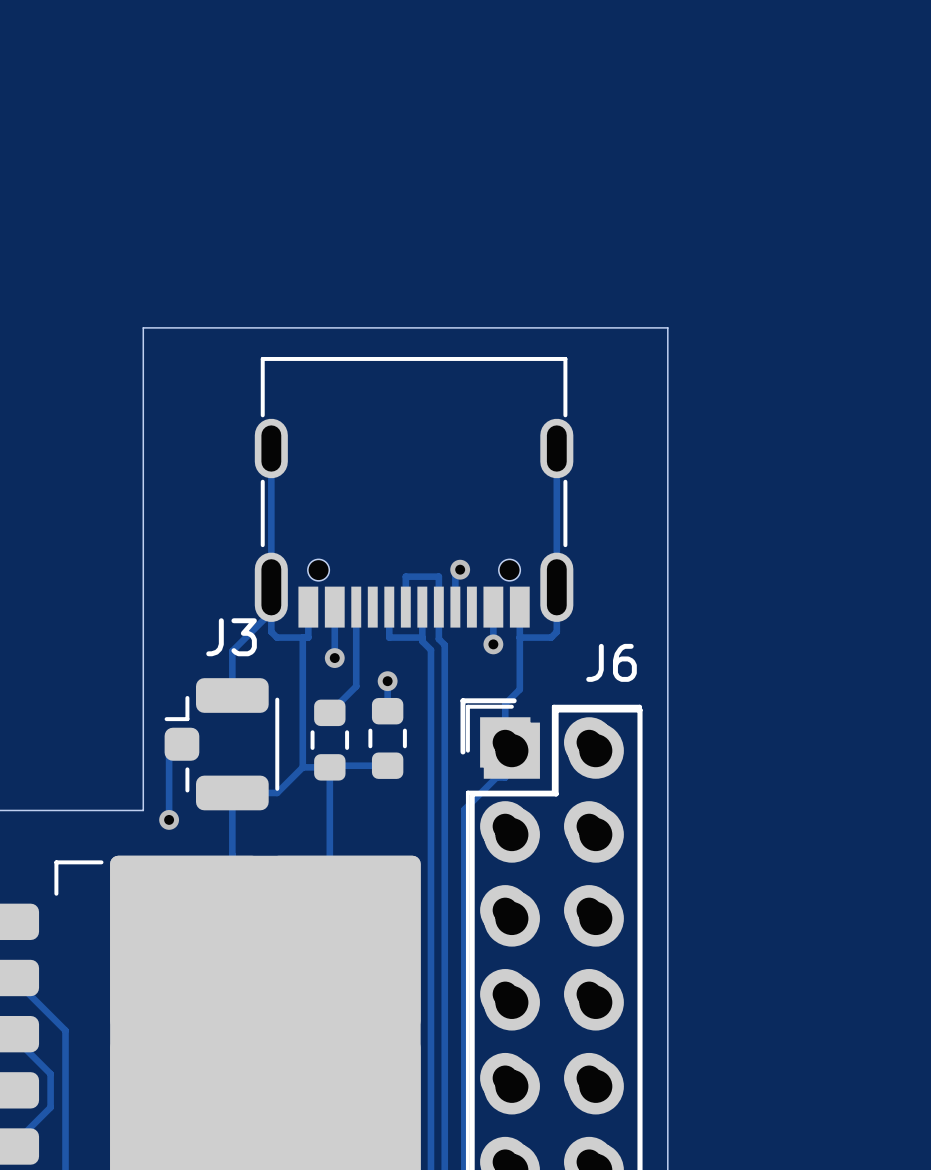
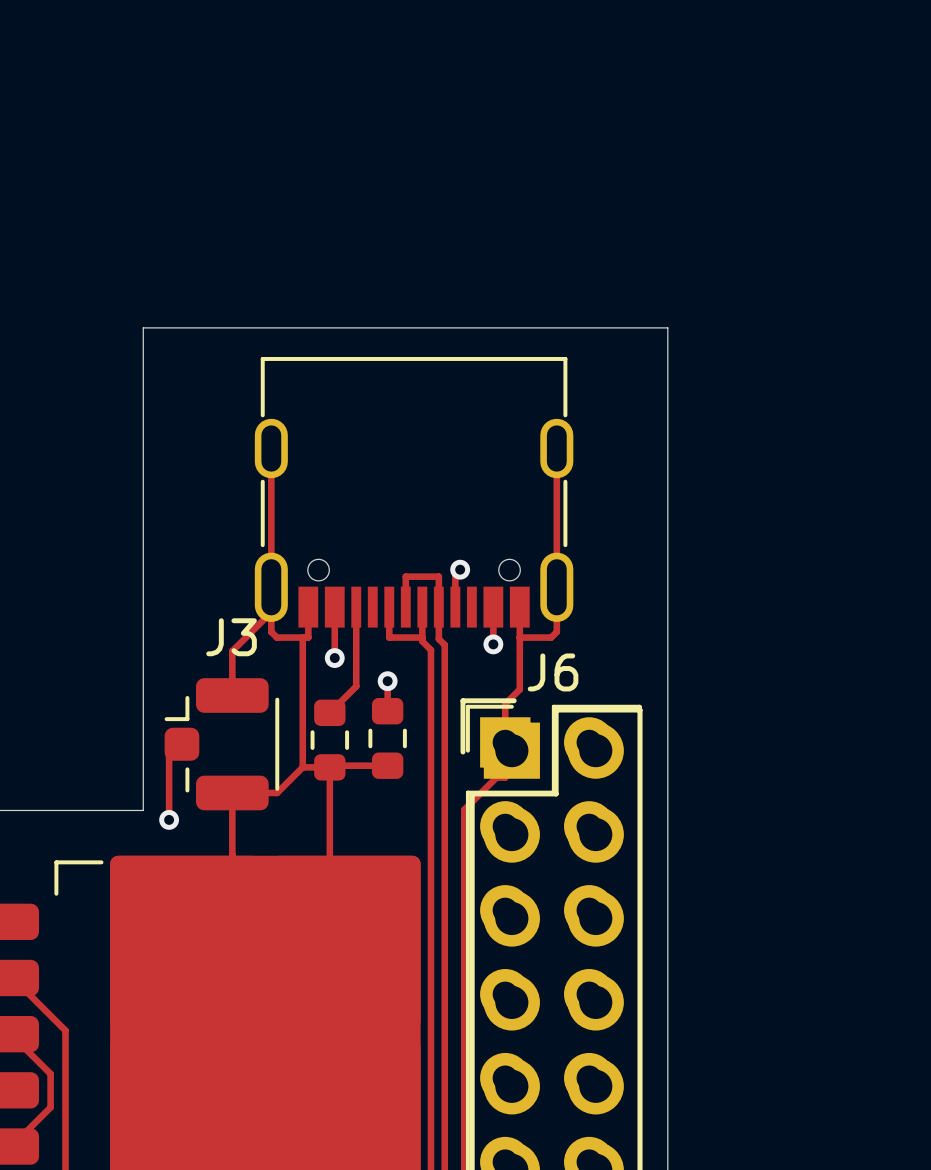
J6 name position: J6 (611, 662) -> J6 (553, 672)

